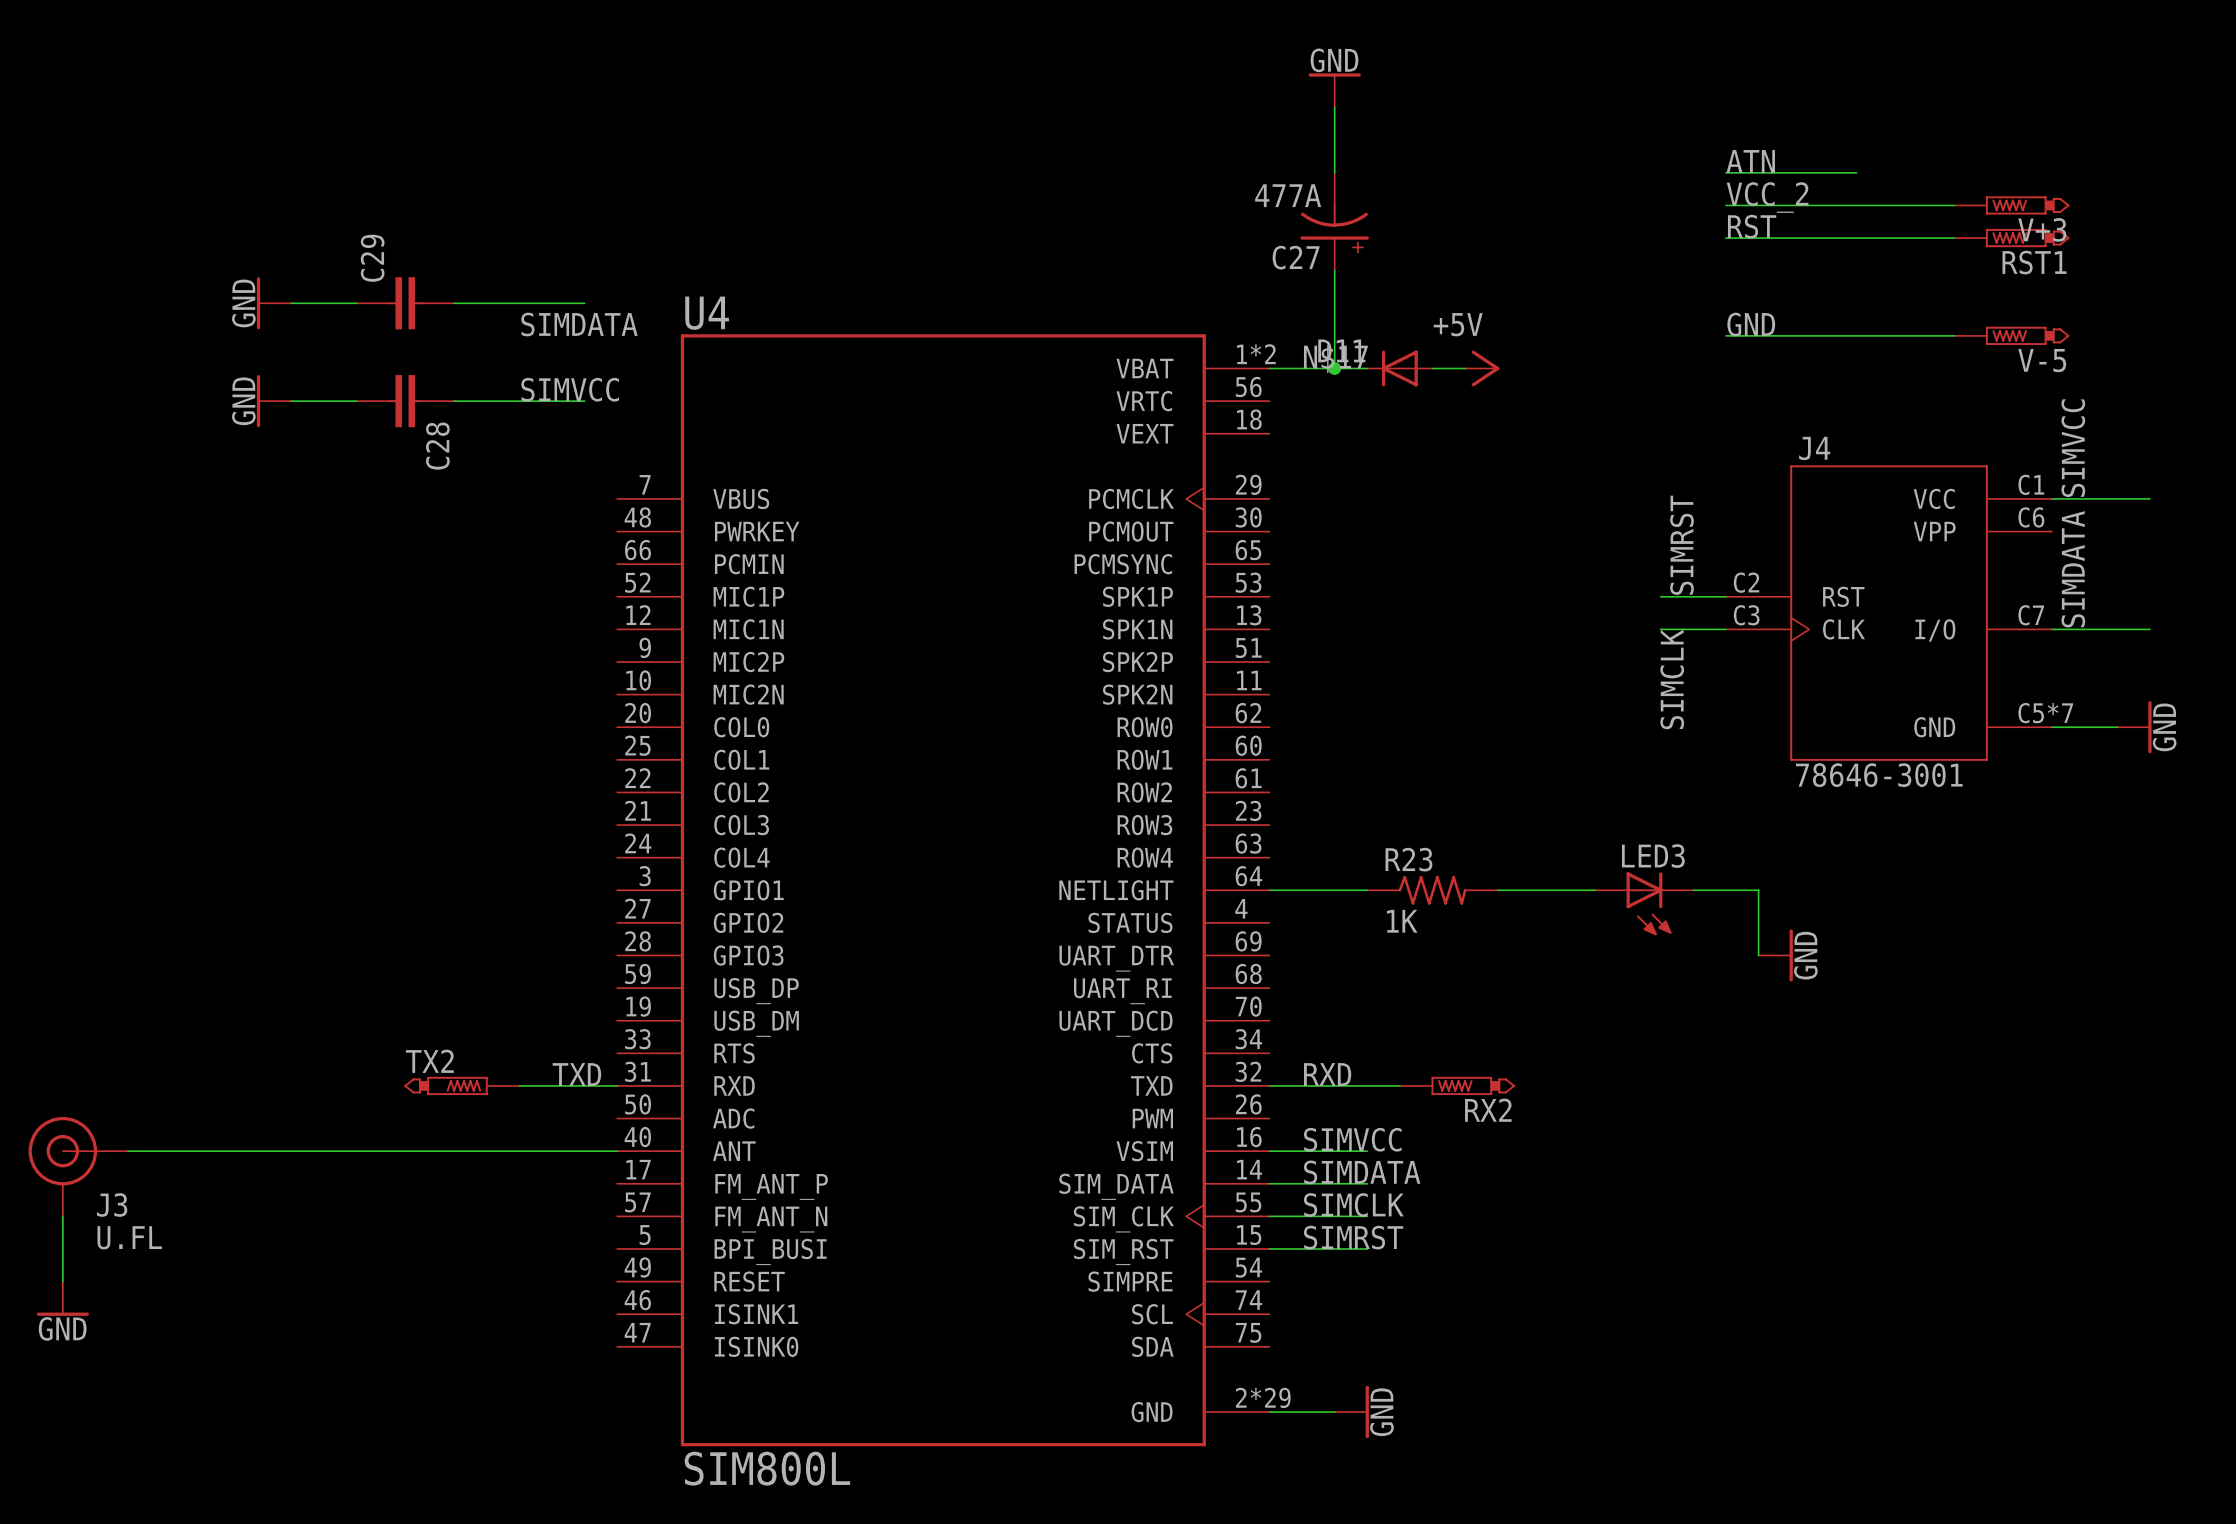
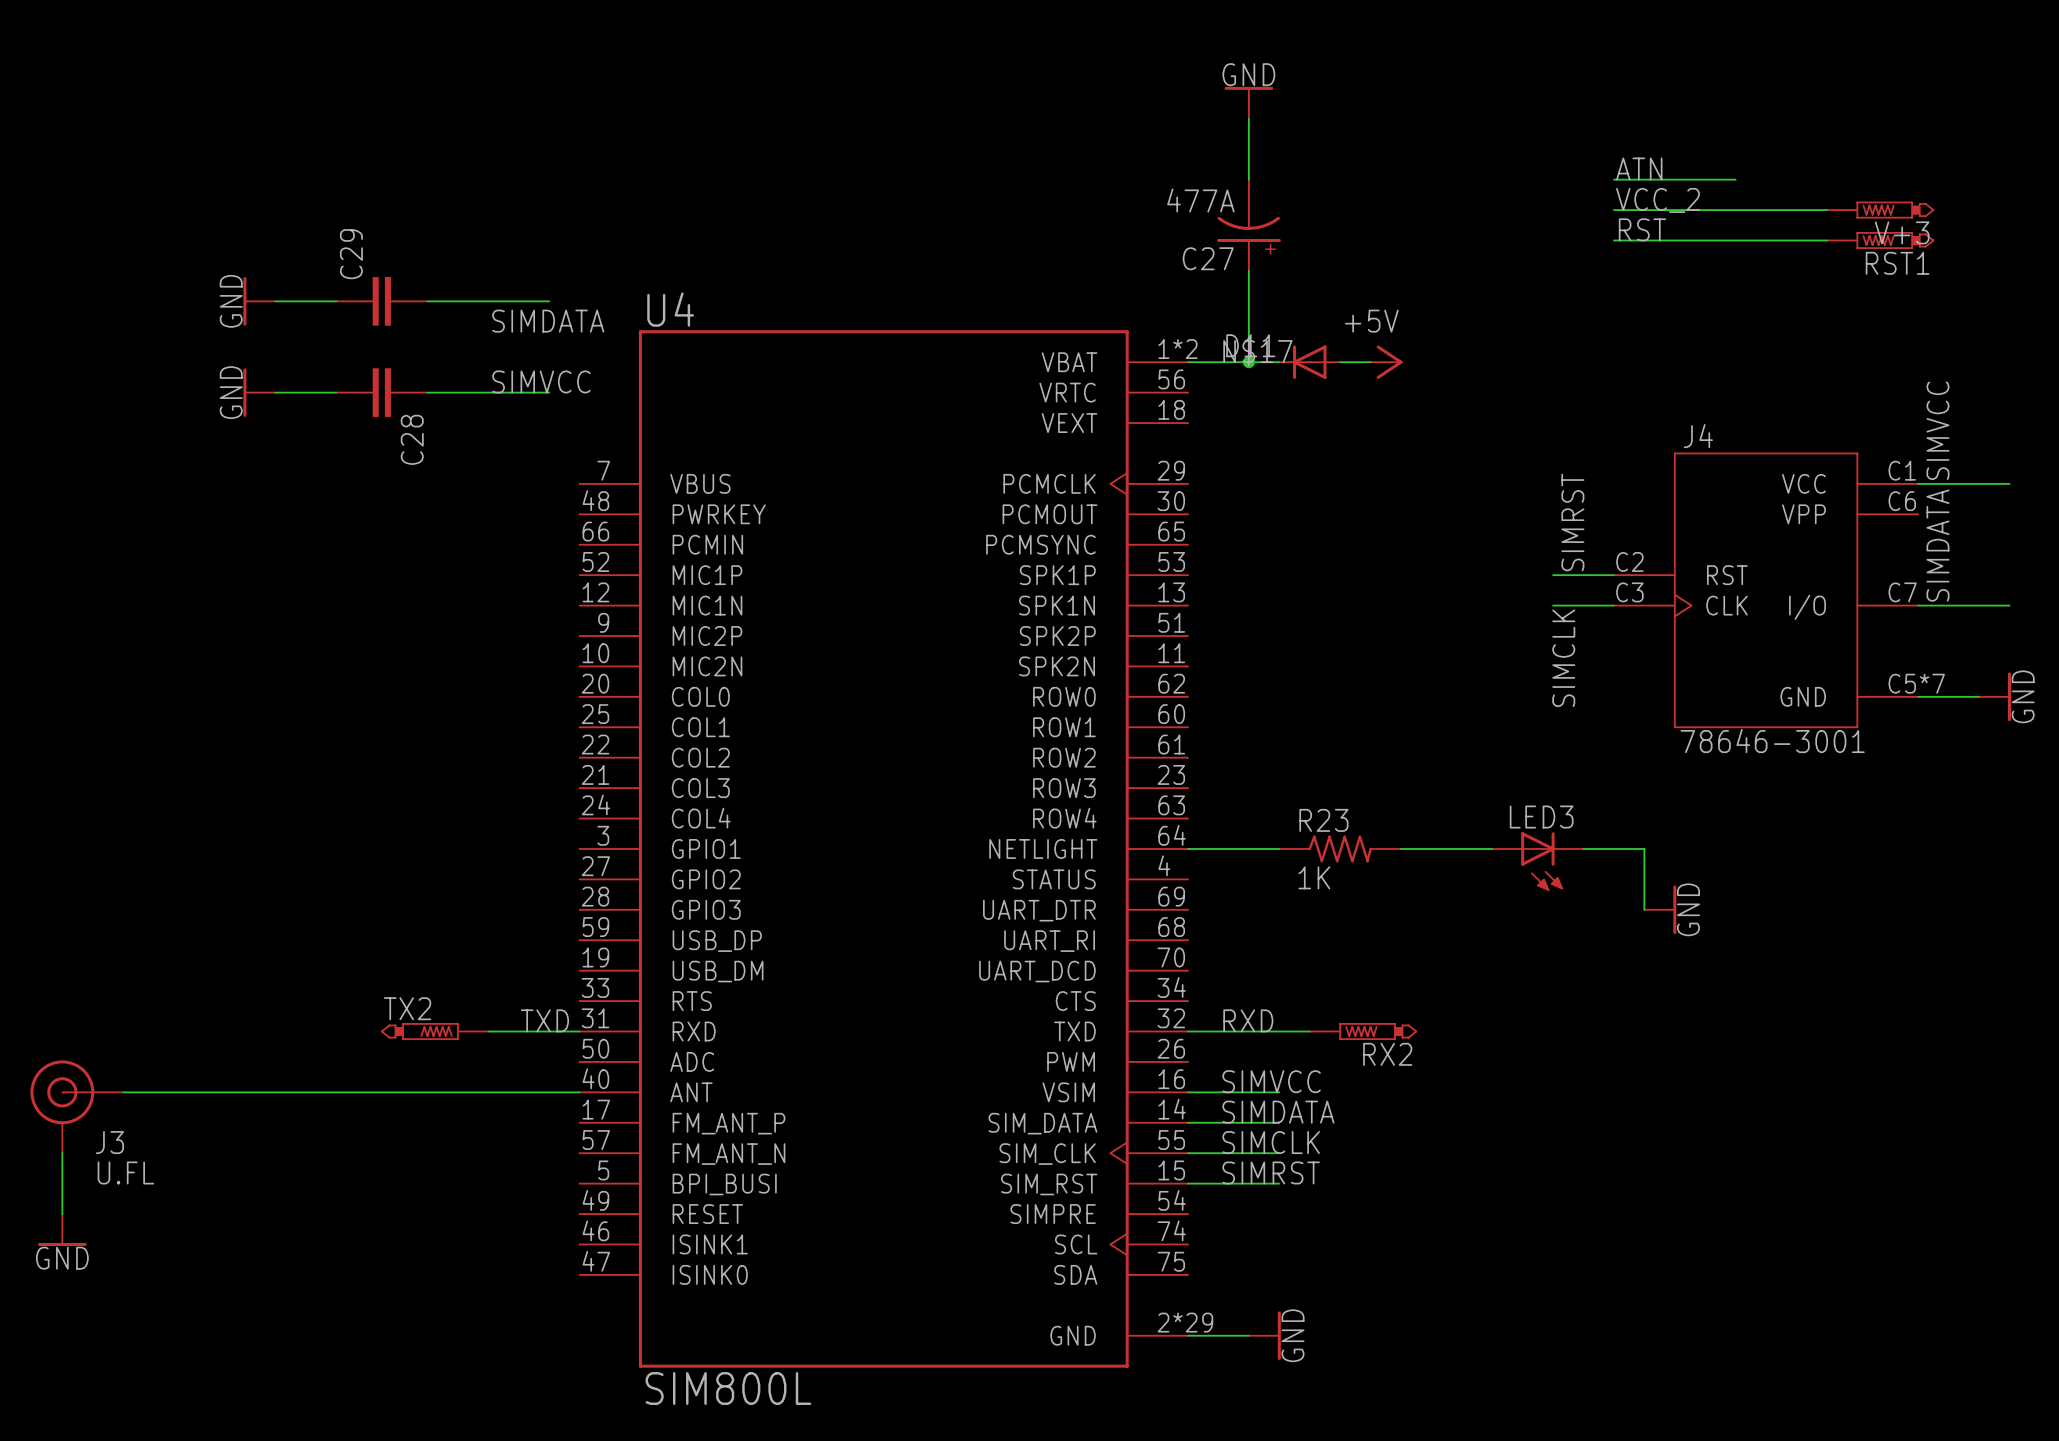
label: GND (1751, 324) -> none
wire: (1725, 335) (1954, 335) -> none
V-5: (2011, 335) -> none

